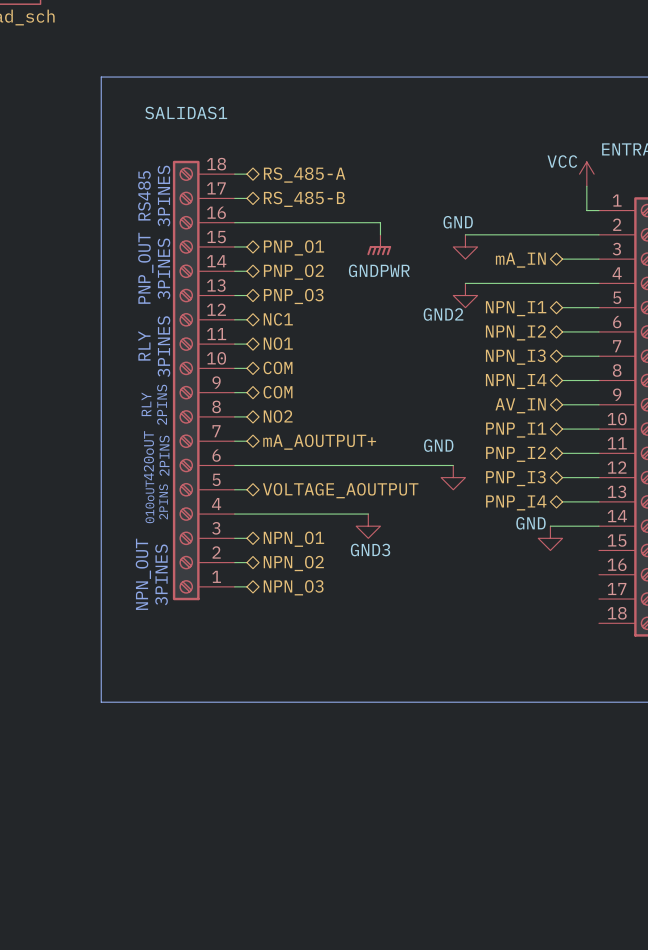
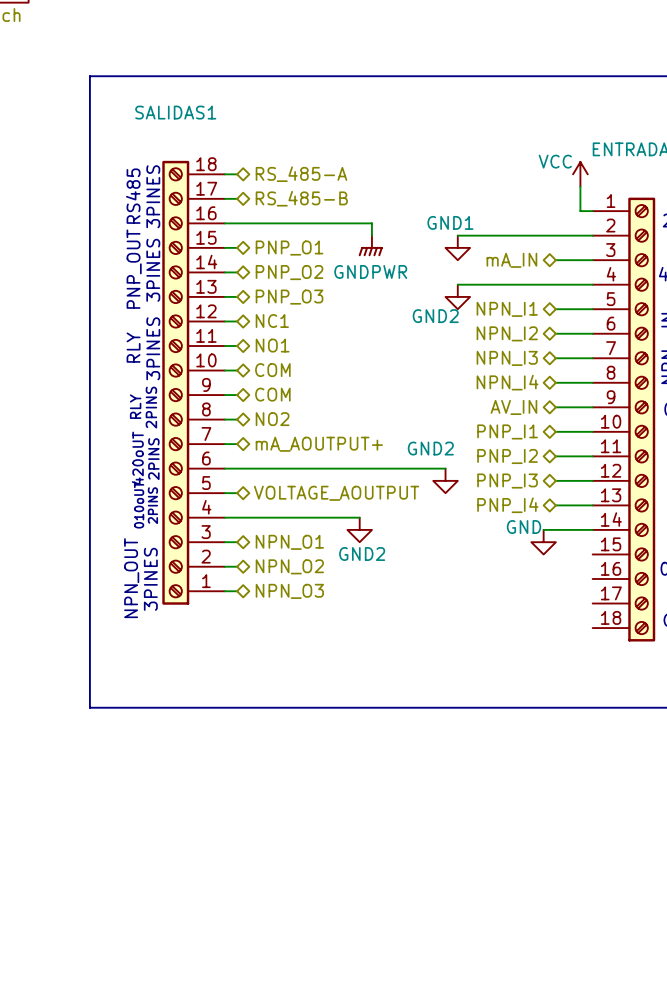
power symbol: GND (465, 246) -> GND1 (457, 247)
power symbol: GND (453, 477) -> GND2 (445, 480)
power symbol: GND3 (368, 526) -> GND2 (359, 529)

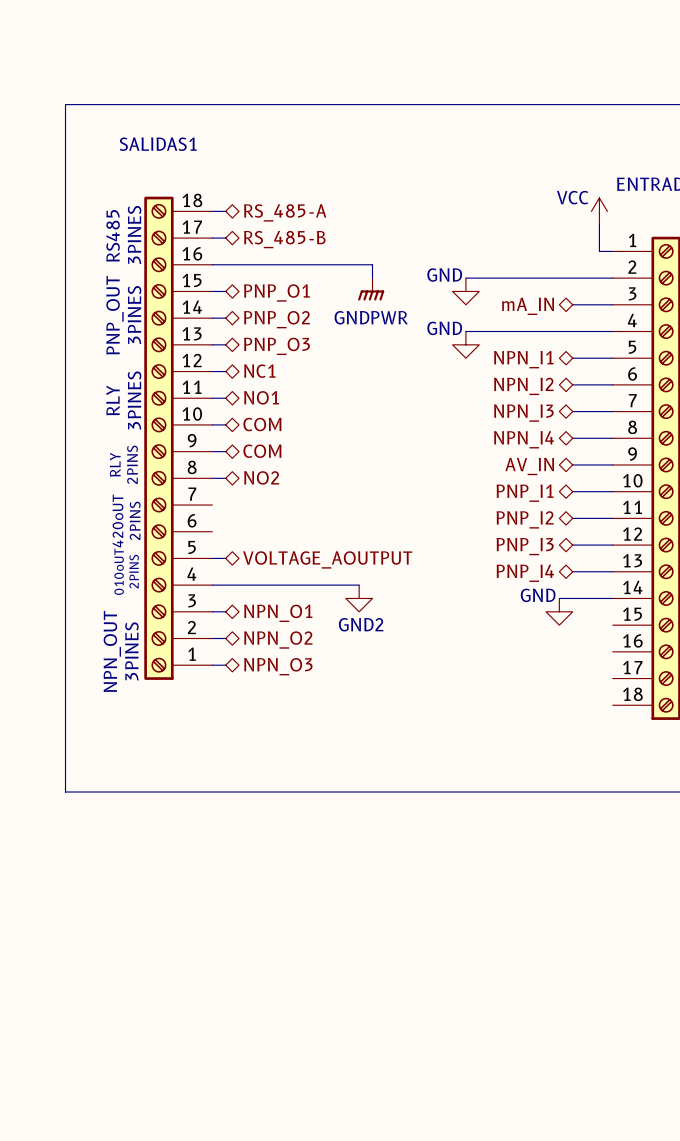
power symbol: GND1 (457, 247) -> GND (465, 291)
power symbol: GND2 (457, 296) -> GND (465, 344)
wire: (224, 444) (237, 444) -> none
hierarchical label: mA_AOUTPUT+ (319, 444) -> none
wire: (224, 468) (445, 468) -> none
power symbol: GND2 (445, 480) -> none

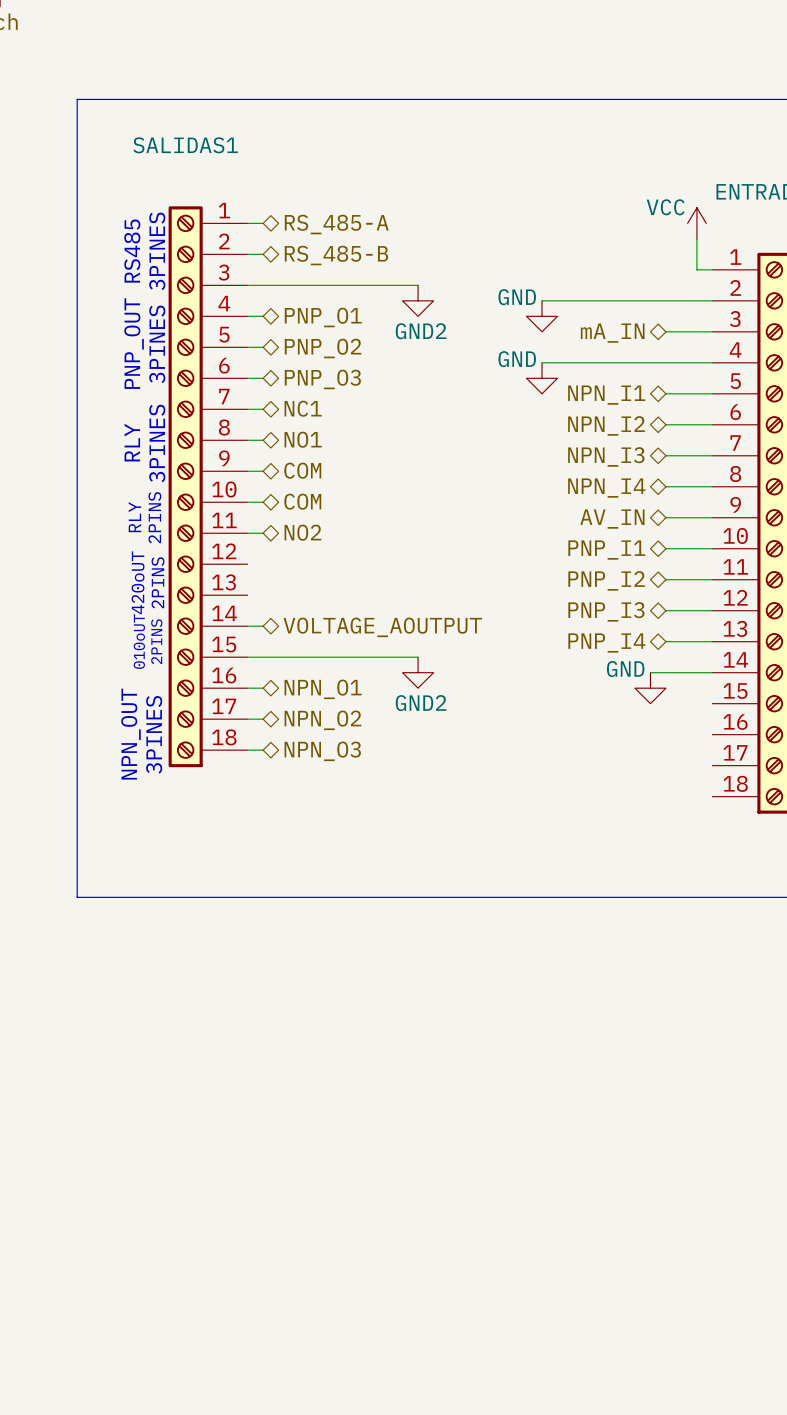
SALIDAS1 symbol: [144, 196, 213, 680] -> [168, 206, 248, 768]
wire: (359, 264) (372, 264) (372, 278) -> none
power symbol: none -> GND2 (418, 300)
power symbol: GNDPWR (371, 289) -> none

